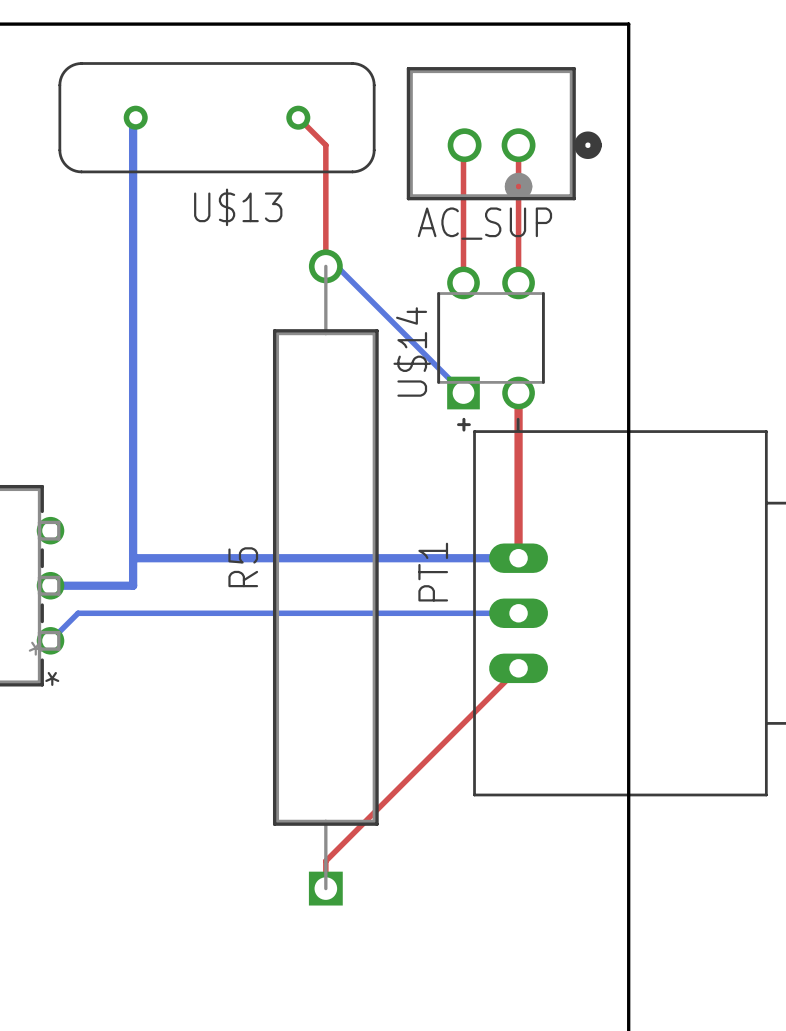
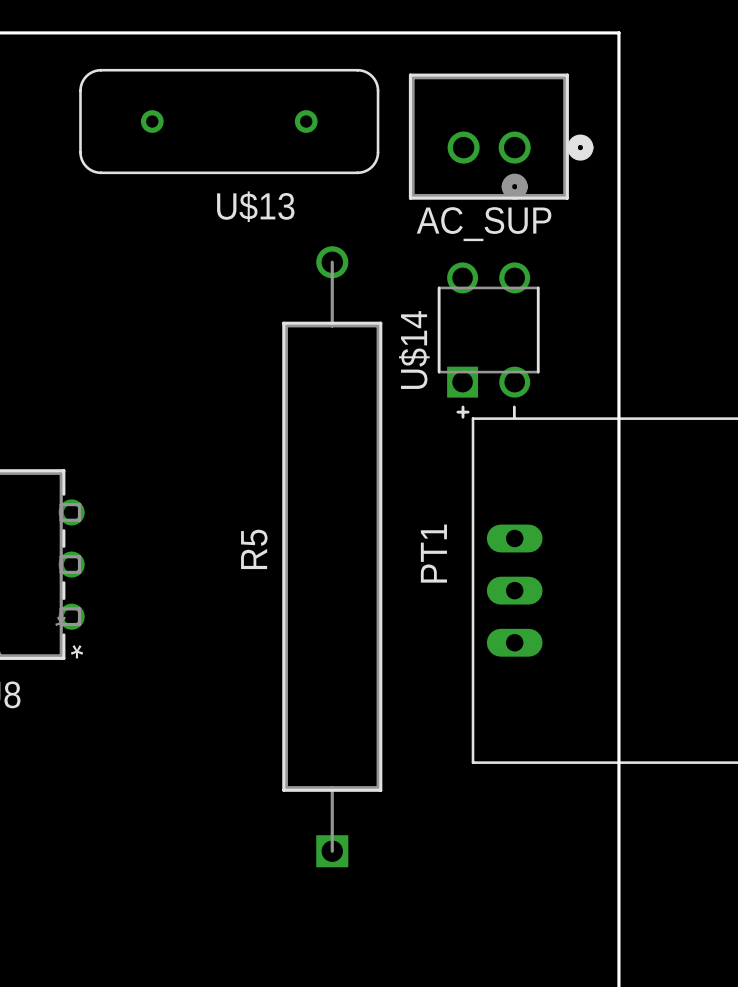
bottom track: (135, 117) (133, 117) (133, 585) (50, 585) -> none
top track: (298, 117) (325, 145) (325, 266) -> none
top track: (464, 145) (463, 282) -> none
top track: (518, 145) (518, 282) -> none
bottom track: (325, 266) (325, 269) (339, 269) (463, 393) -> none
top track: (518, 393) (518, 558) -> none
bottom track: (133, 558) (518, 558) -> none
bottom track: (518, 613) (78, 613) (50, 640) -> none
top track: (518, 668) (325, 861) (325, 888) -> none

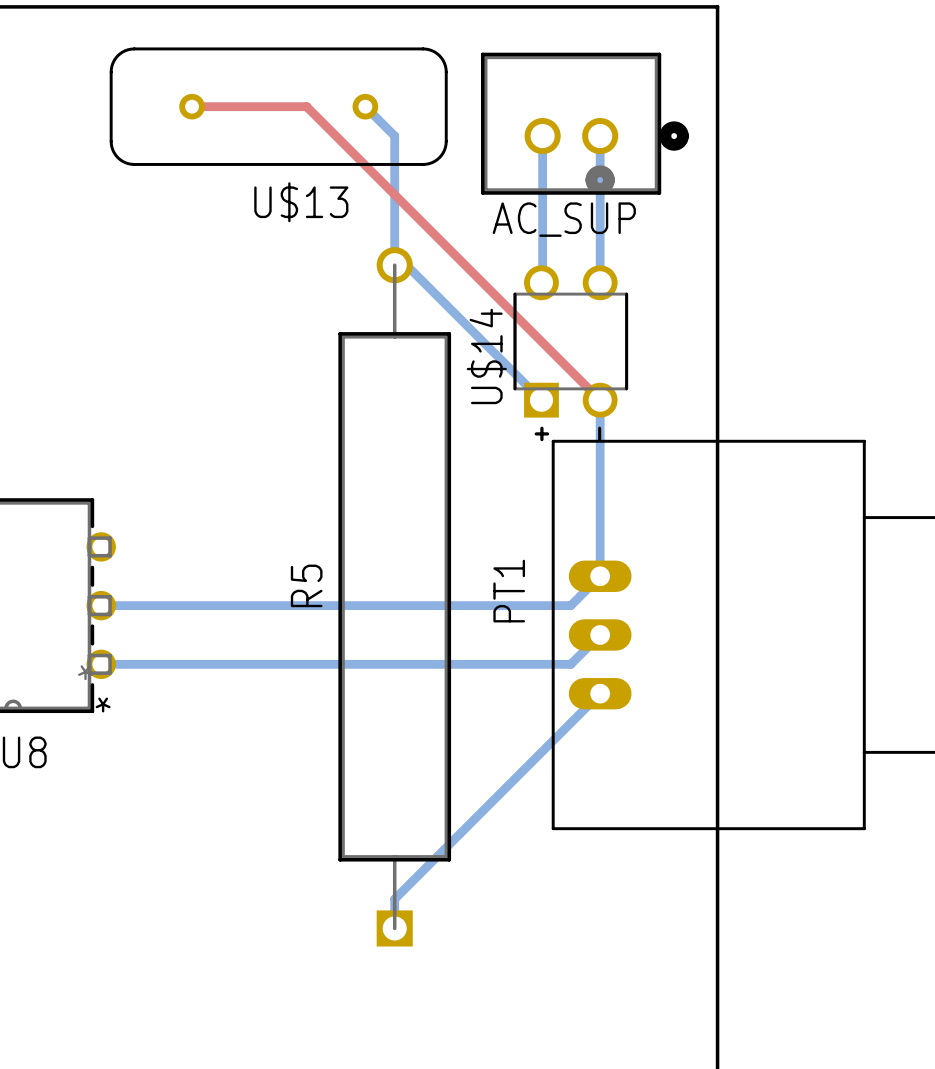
top track: none -> (192, 106) (306, 106) (600, 400)
bottom track: none -> (365, 106) (394, 136) (394, 265) (406, 265) (541, 400)
bottom track: none -> (542, 136) (541, 282)
bottom track: none -> (600, 136) (600, 282)
bottom track: none -> (600, 400) (600, 576) (570, 605) (101, 605)
bottom track: none -> (600, 634) (570, 664) (101, 664)
bottom track: none -> (600, 693) (394, 899) (394, 928)

